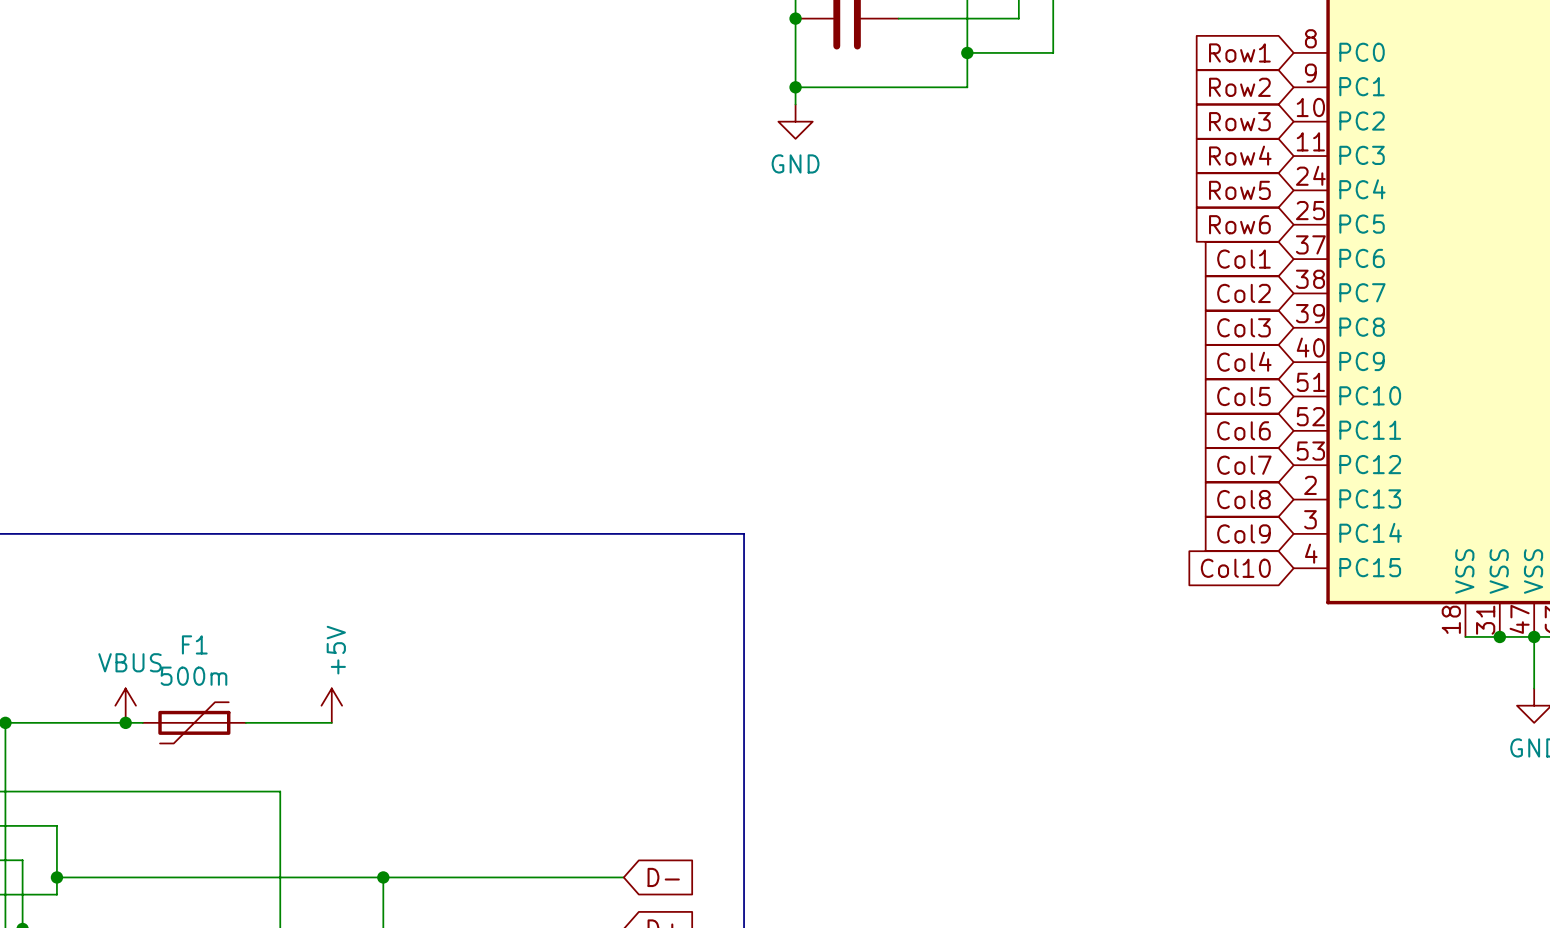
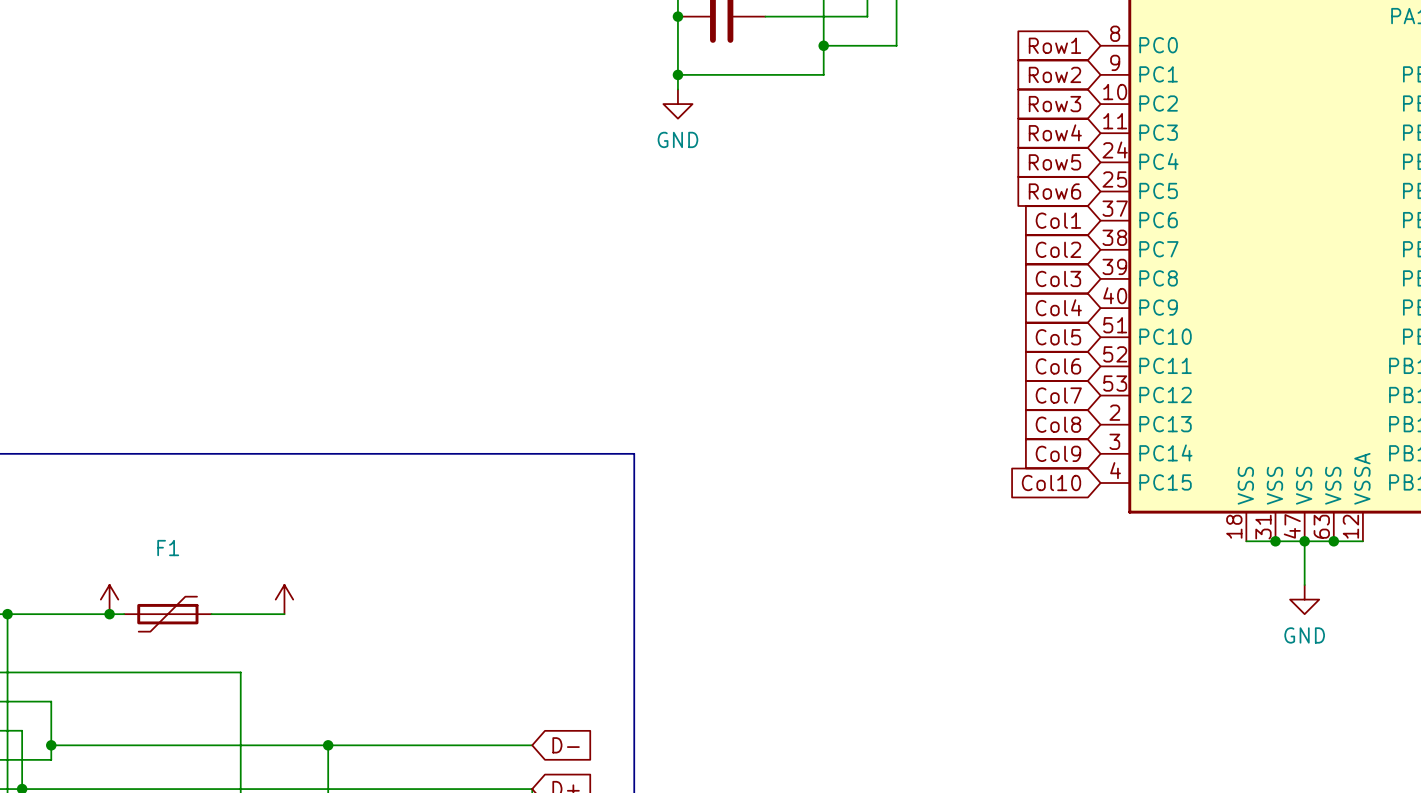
power symbol text: +5V (336, 650) -> none
power symbol text: VBUS (130, 662) -> none
F1 value: 500m (193, 676) -> none

